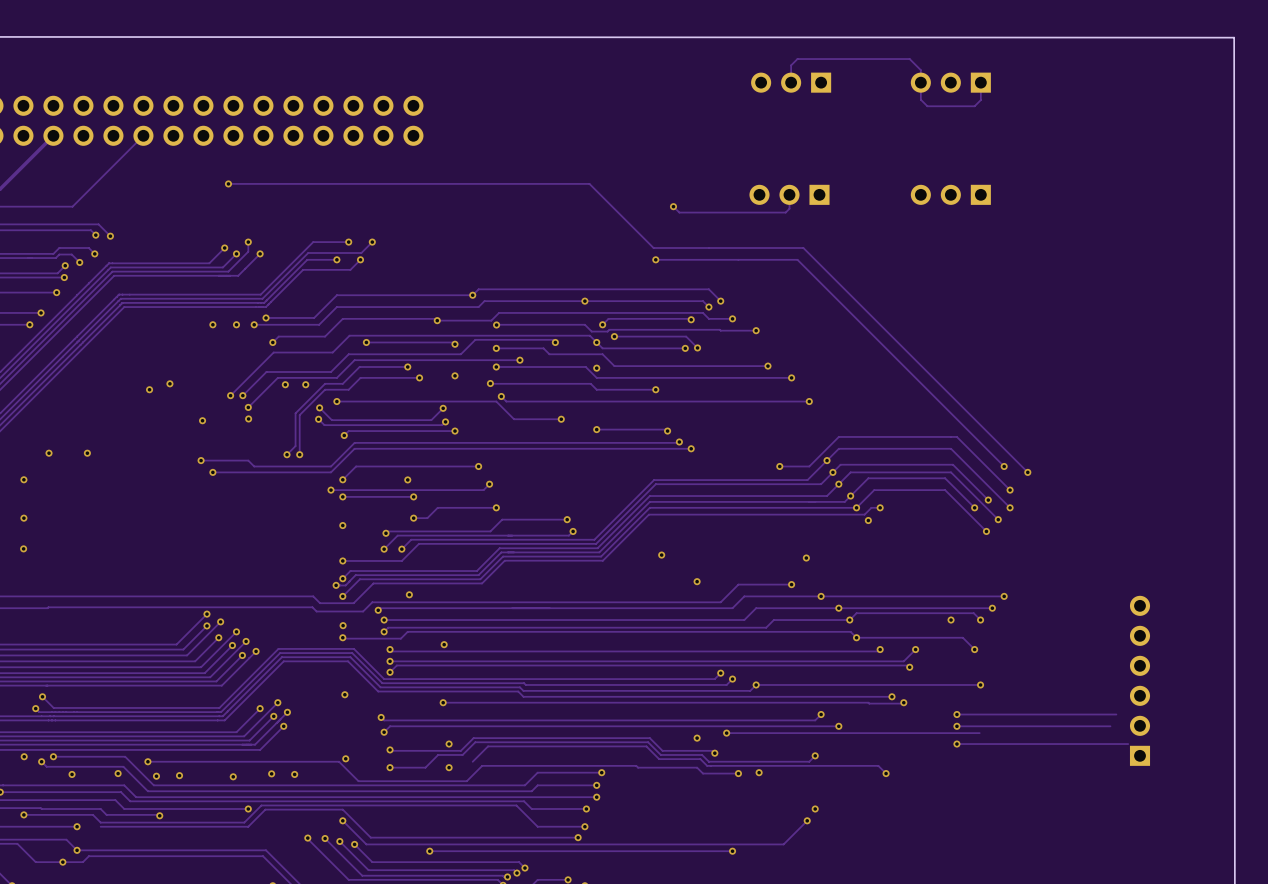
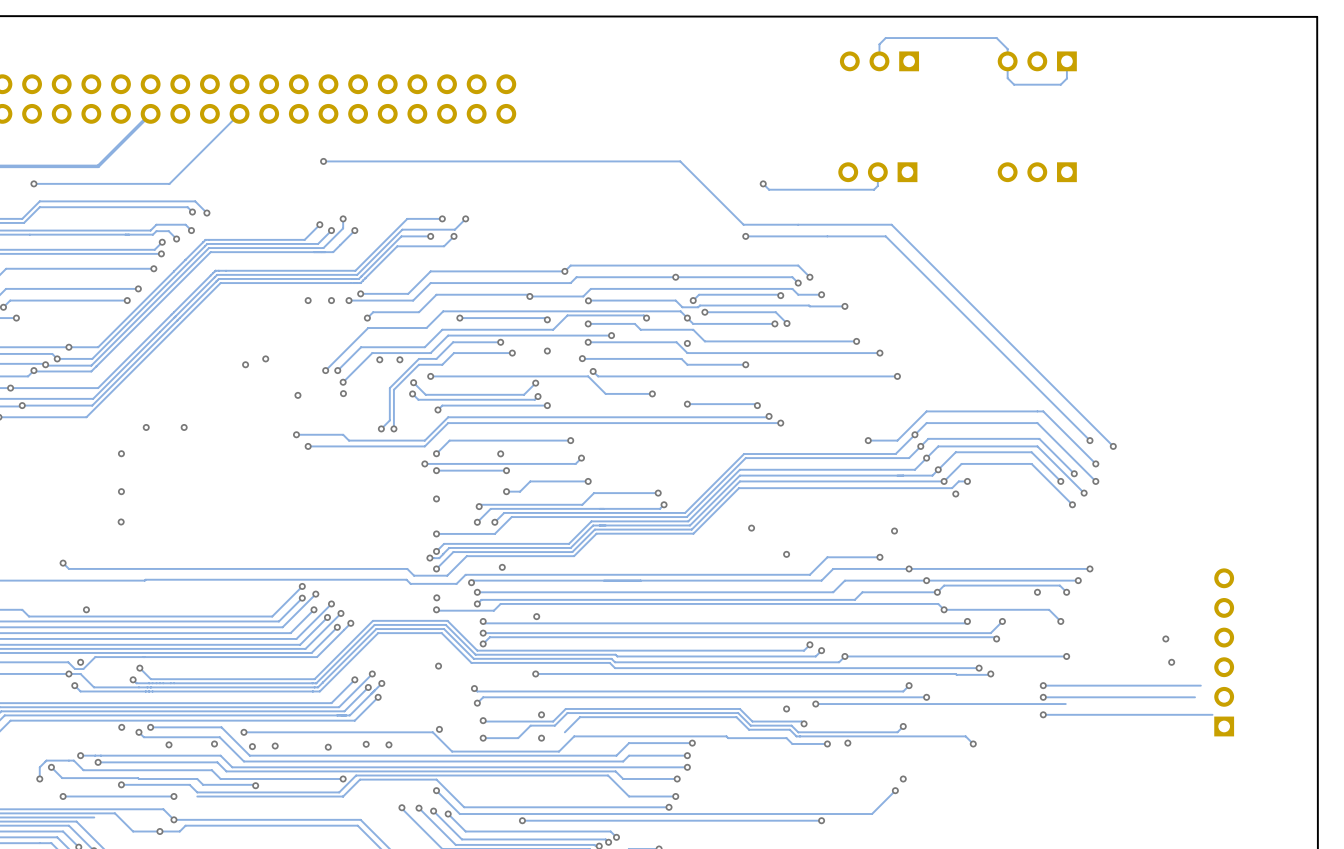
via: none -> (1165, 638)
via: none -> (1171, 662)

